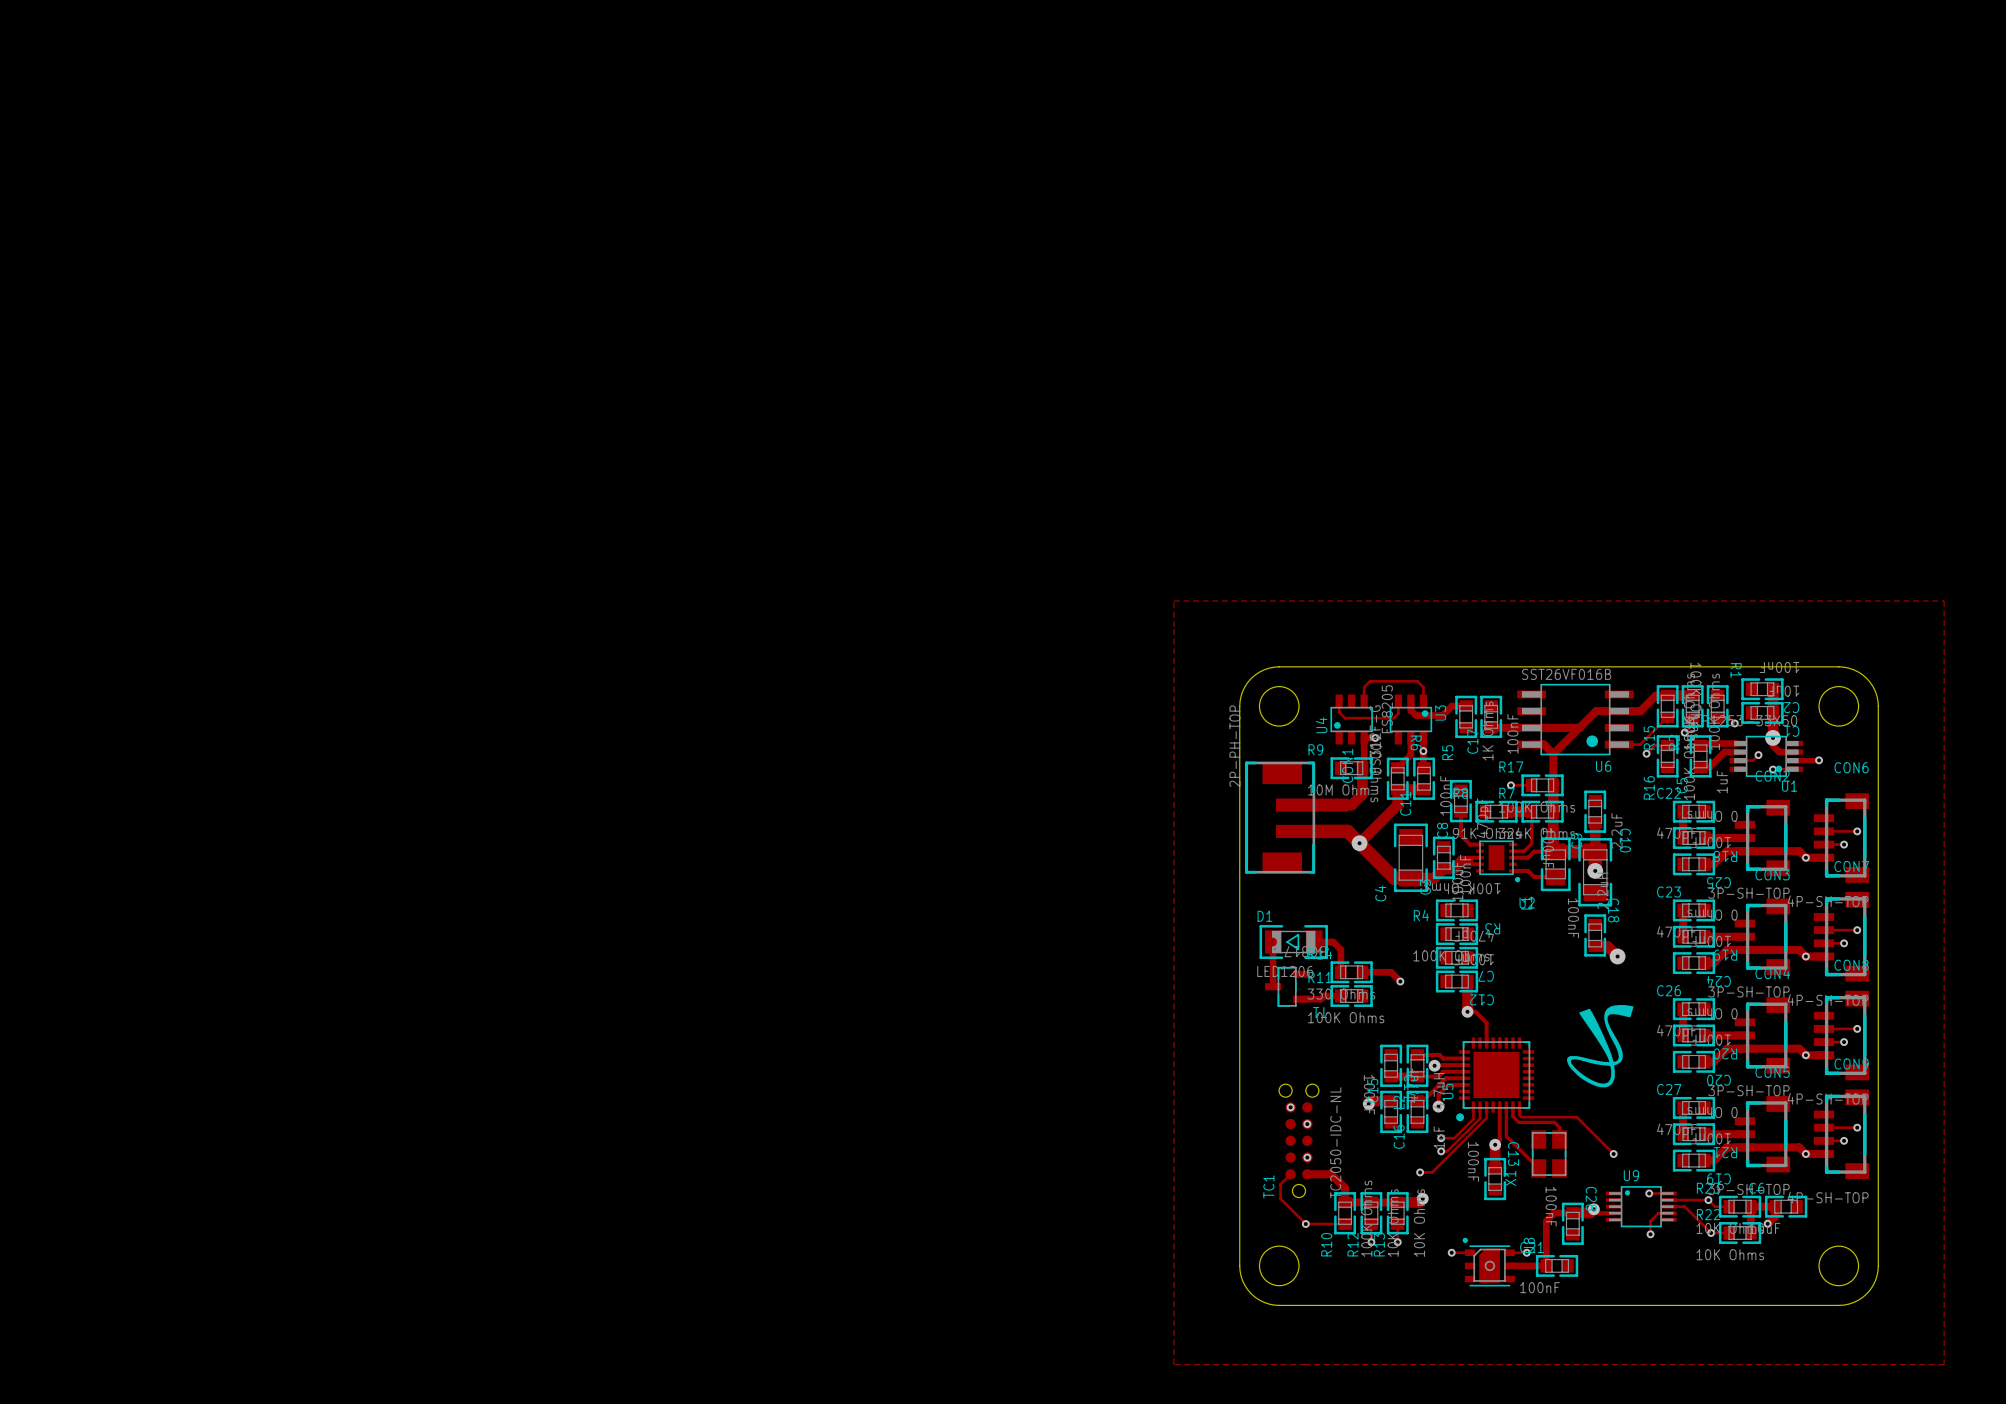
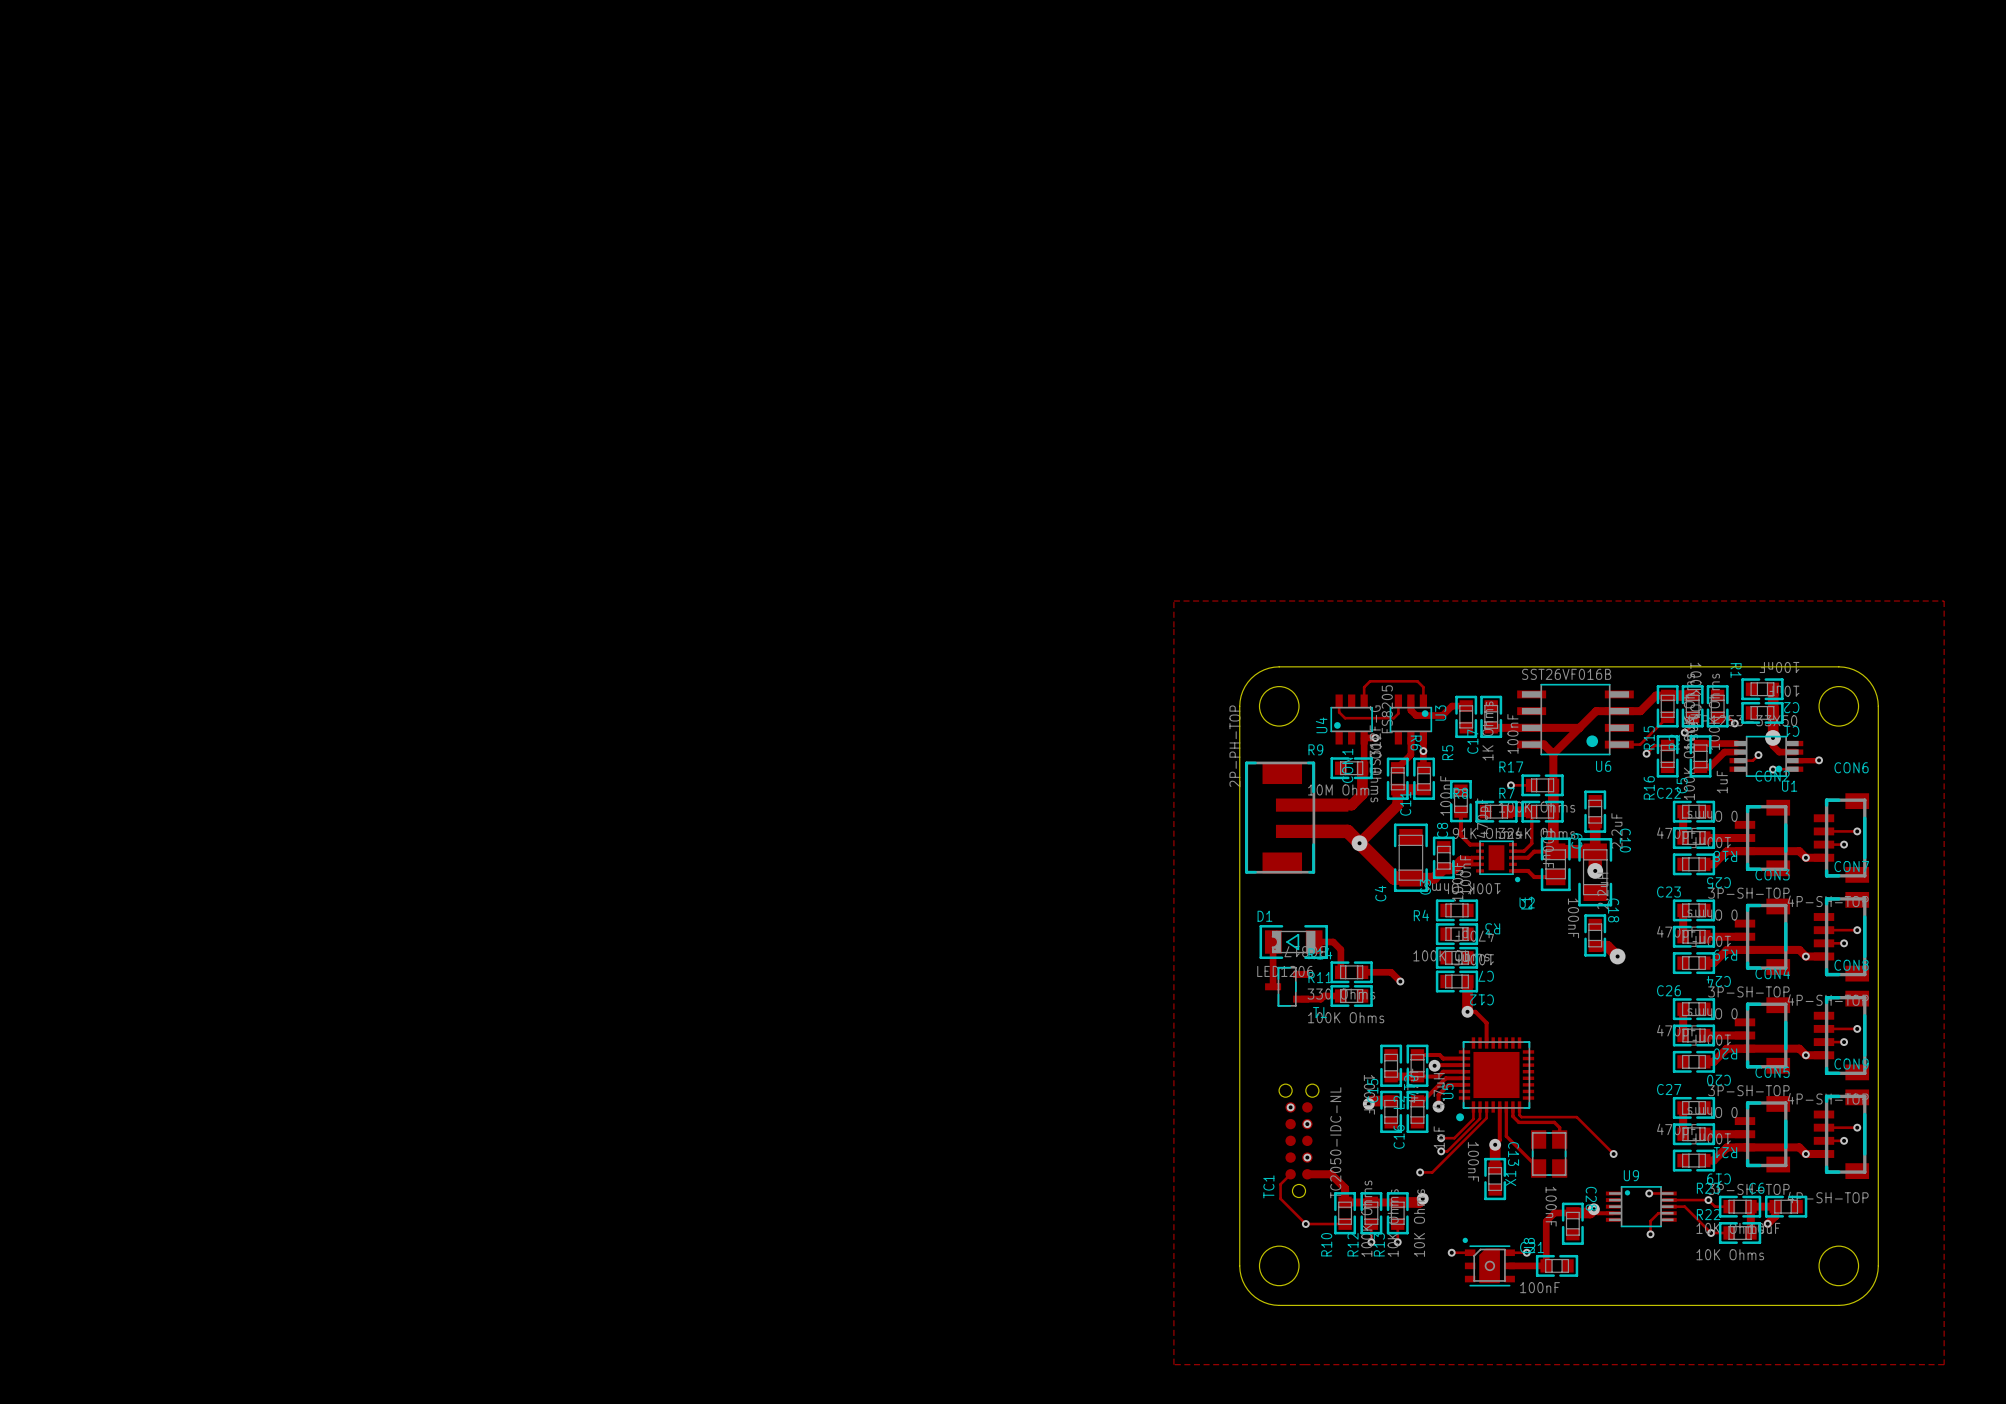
drawing: [1567, 1005, 1634, 1088] -> none

